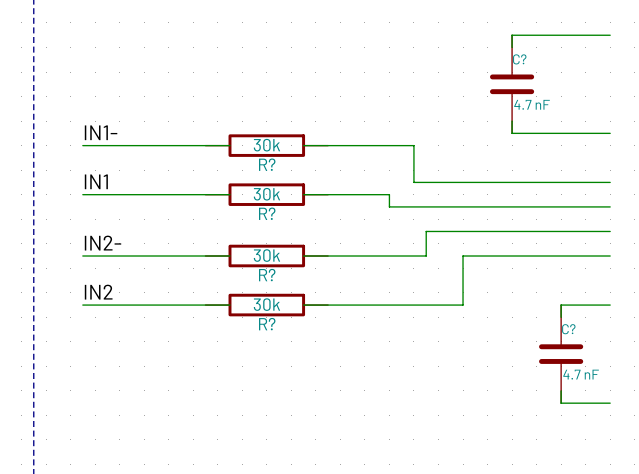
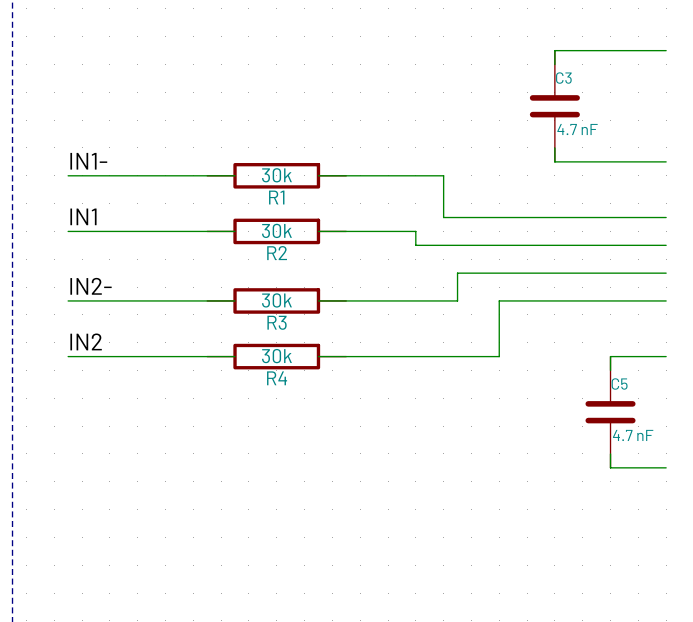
C? name: C? (519, 59) -> C3 (563, 78)
R? name: R? (267, 164) -> R1 (276, 197)
R? name: R? (267, 213) -> R2 (277, 253)
R? name: R? (267, 275) -> R3 (277, 322)
R? name: R? (267, 324) -> R4 (277, 378)
C? name: C? (568, 329) -> C5 (619, 384)

